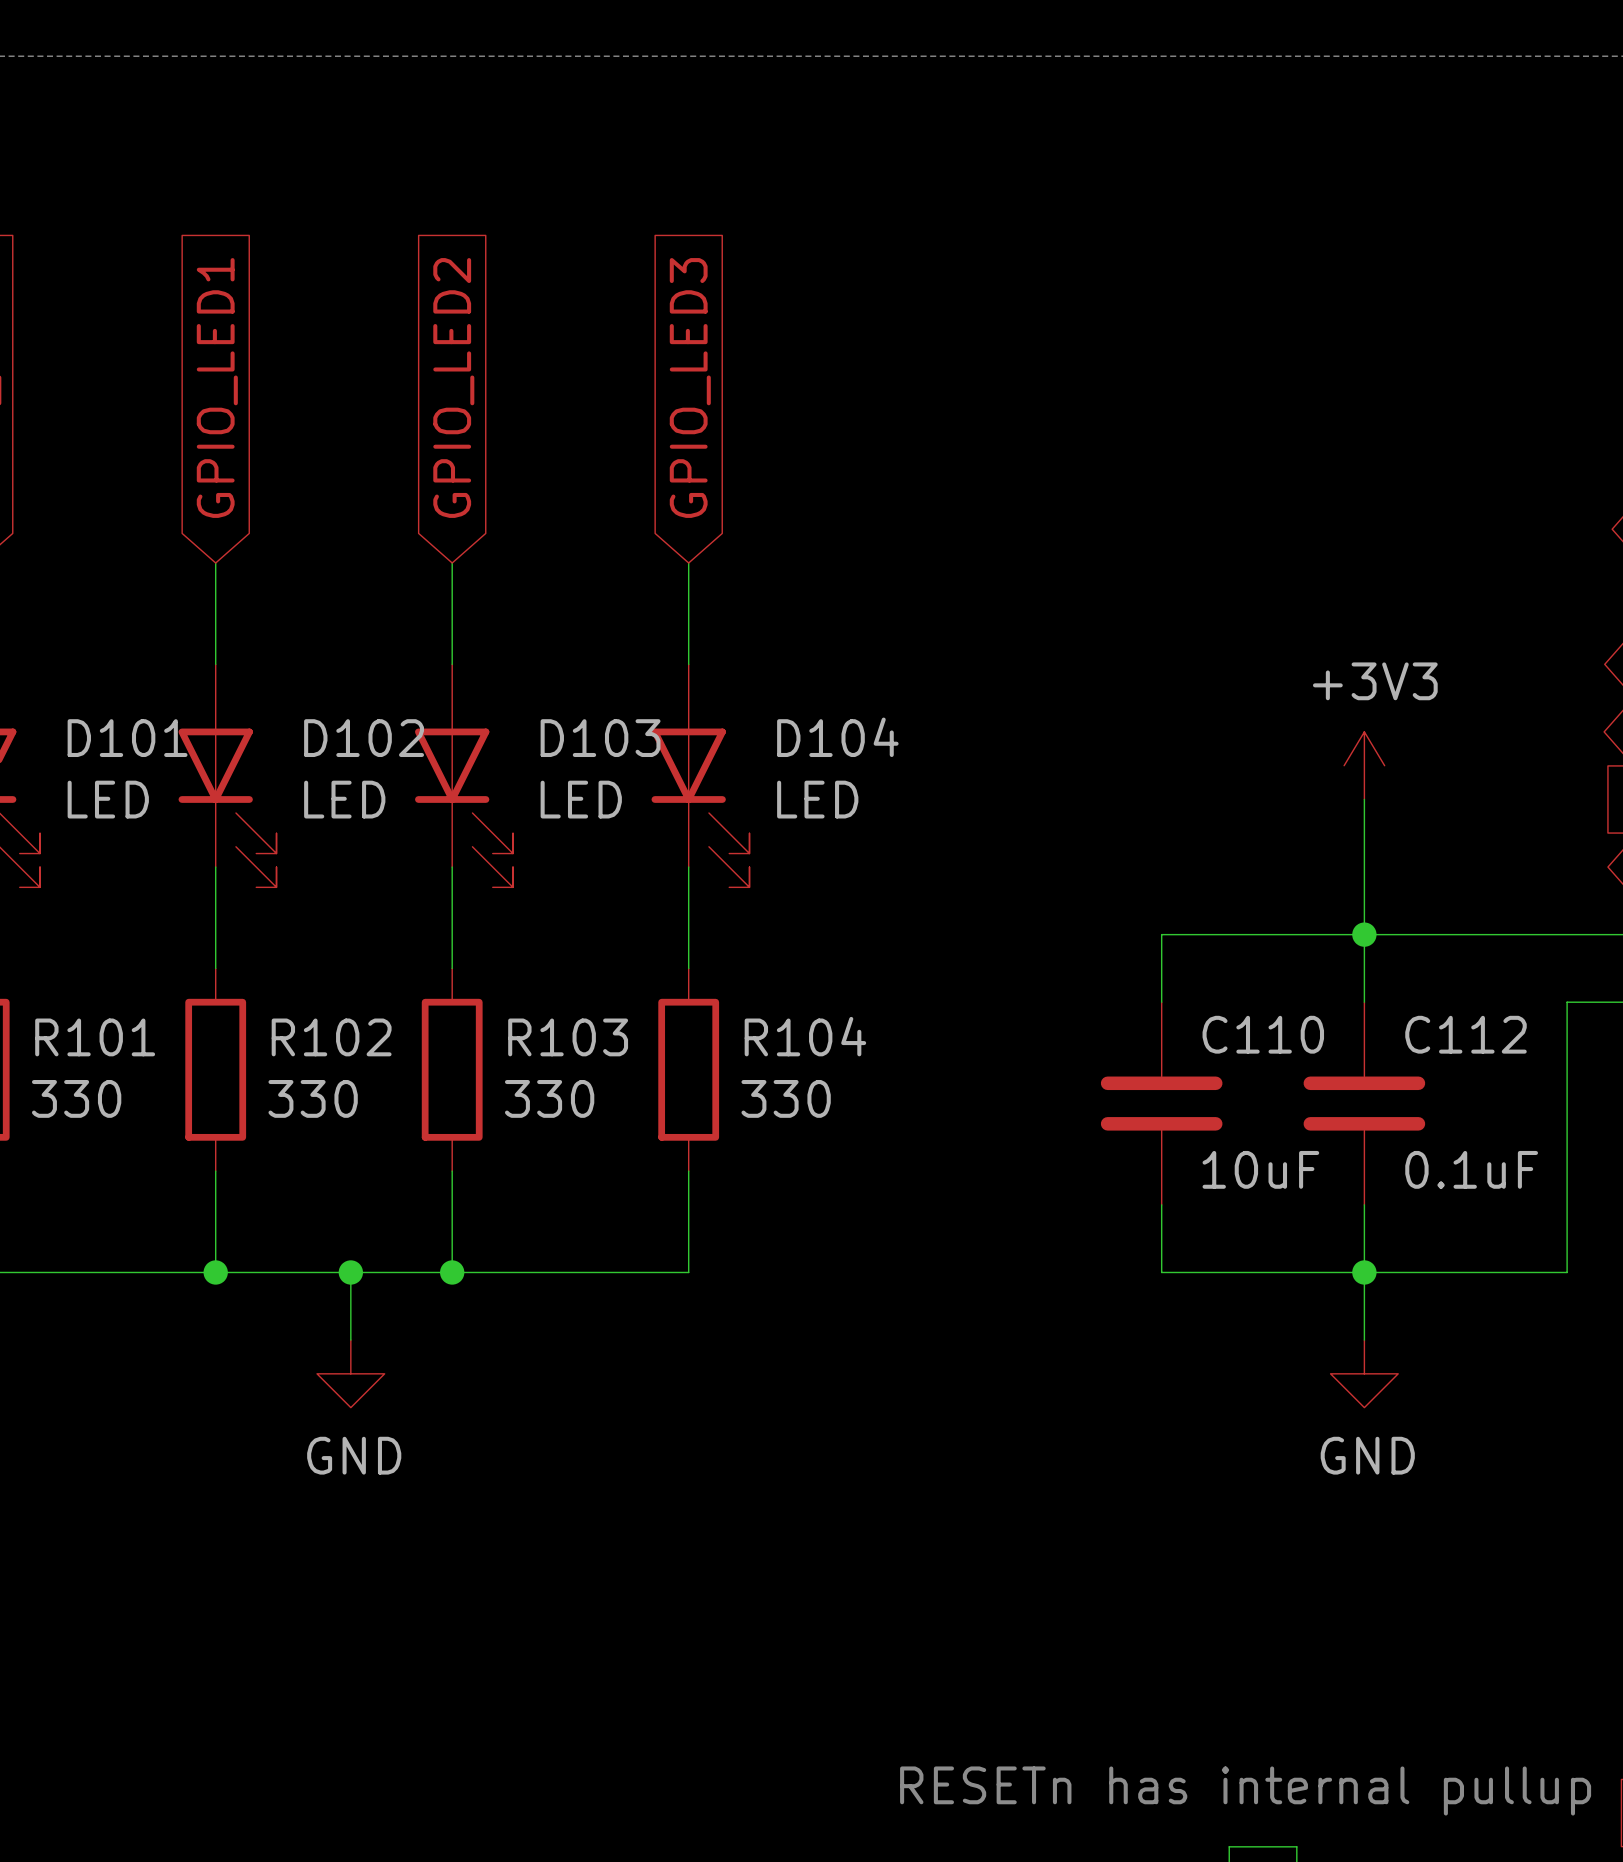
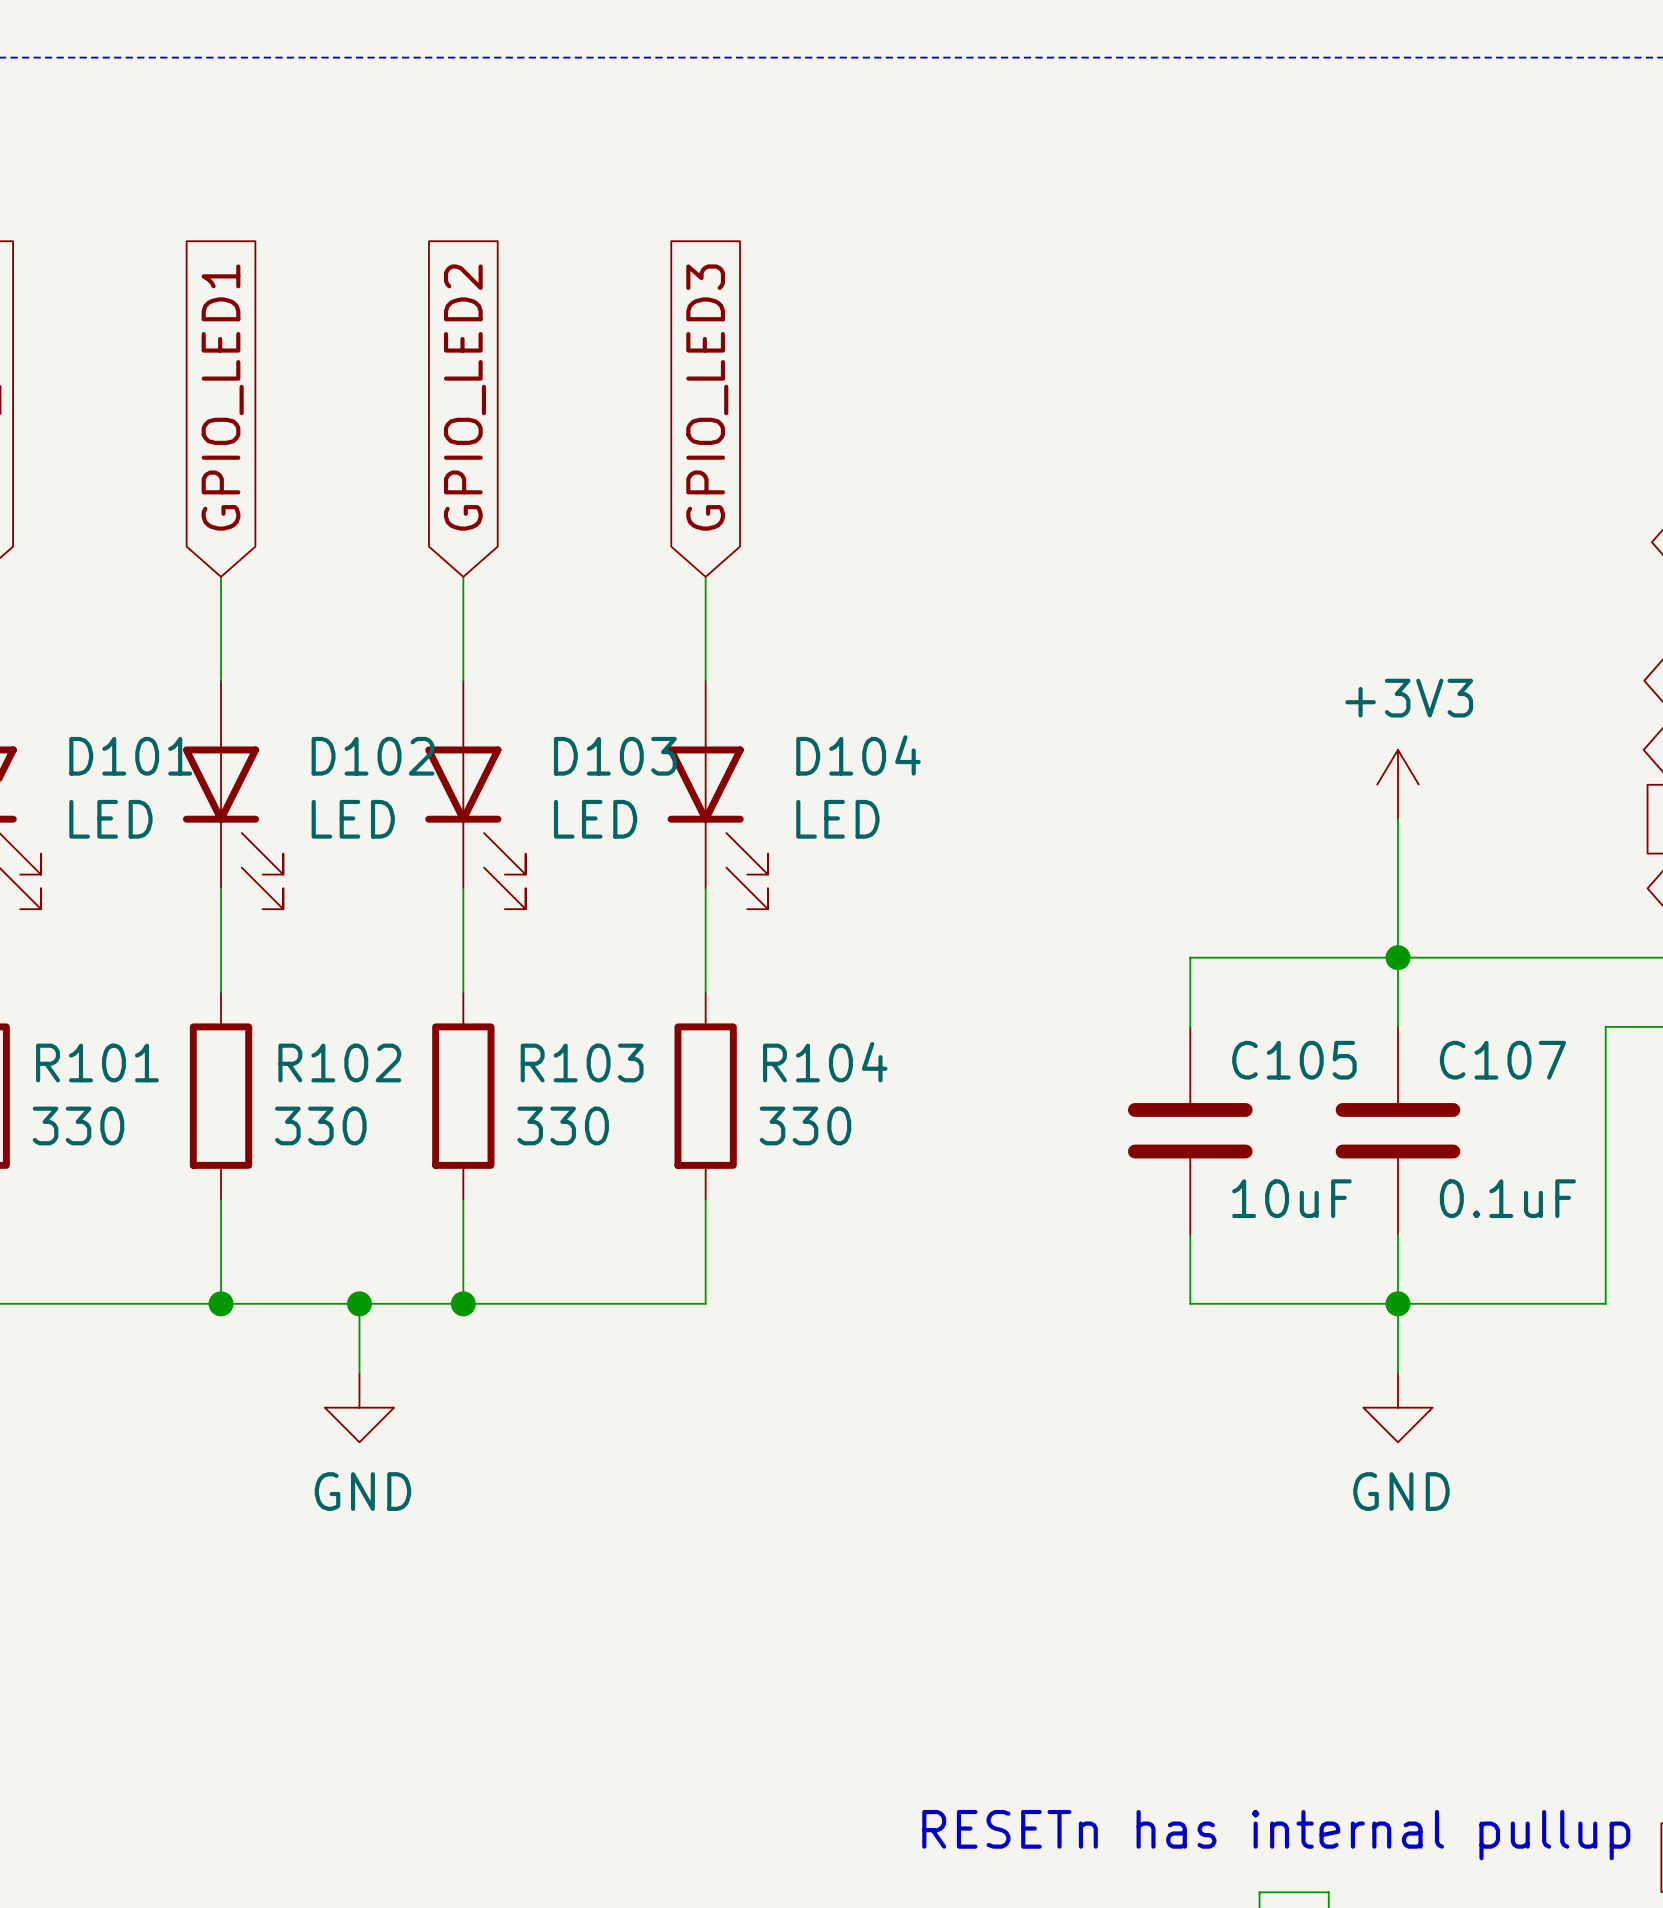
C110 name: C110 (1263, 1034) -> C105 (1294, 1060)
C112 name: C112 (1466, 1034) -> C107 (1502, 1060)

